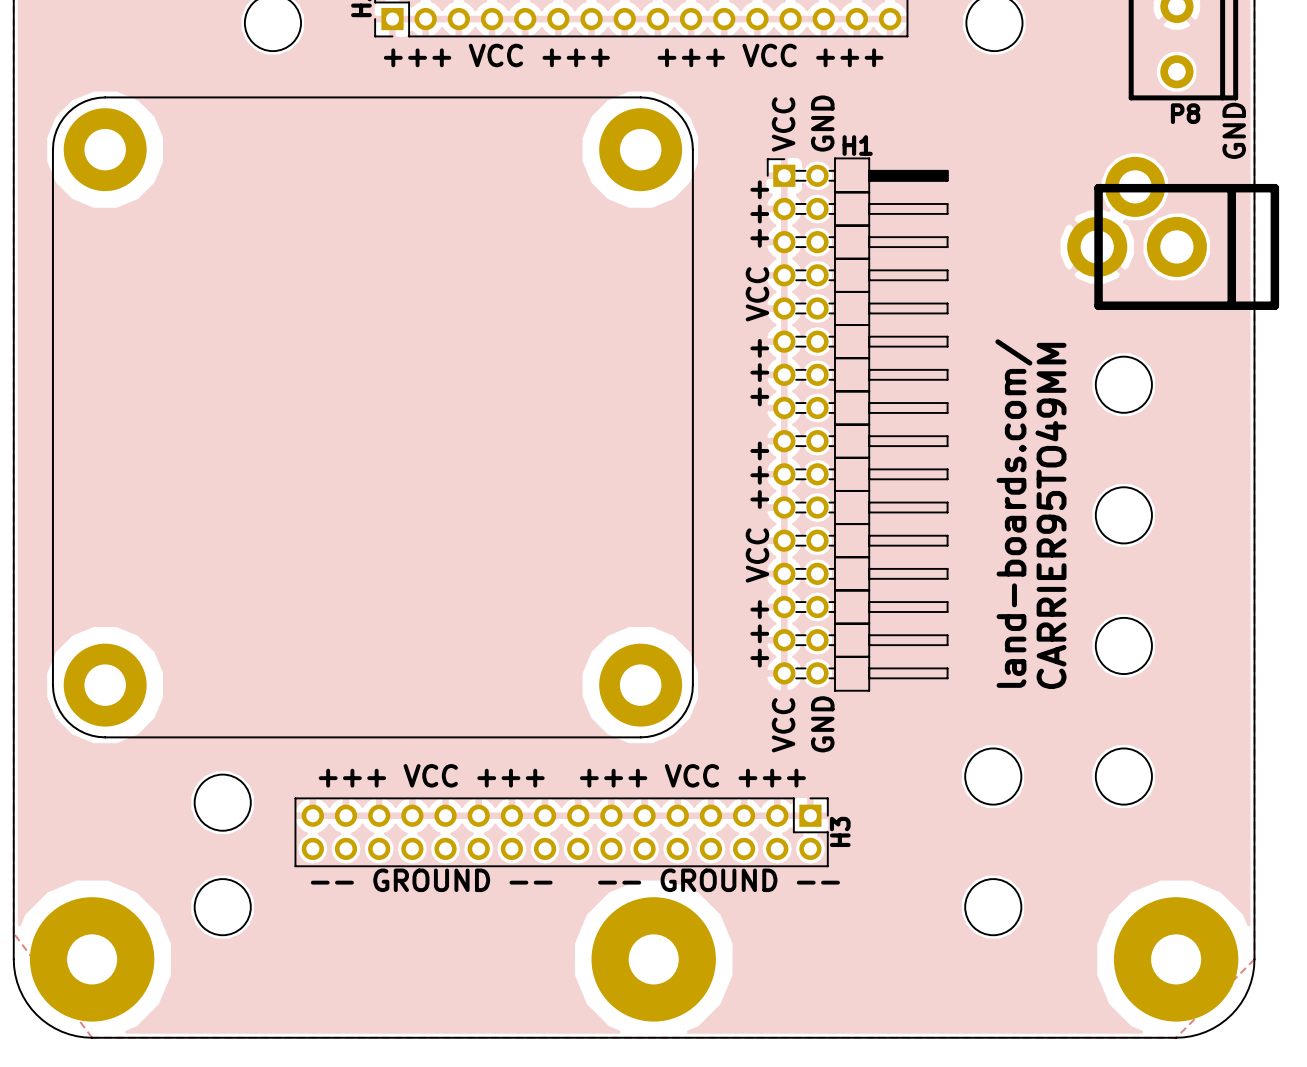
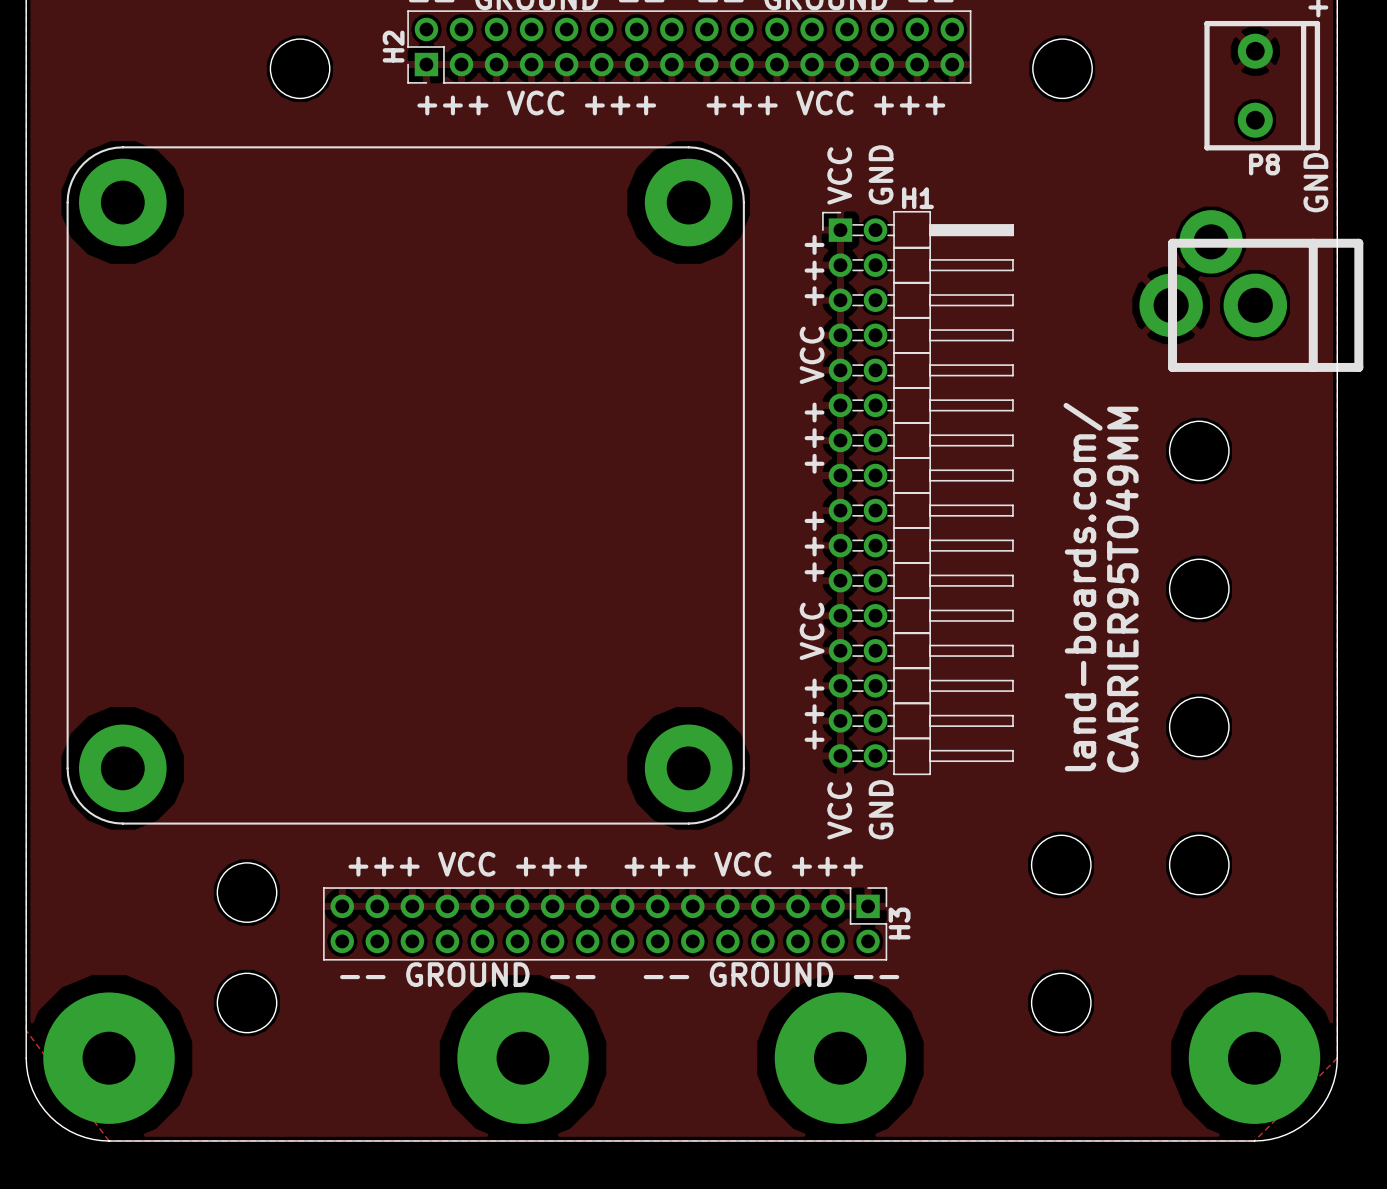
part: none -> (523, 1058)
part: (653, 959) -> none
part: none -> (840, 1058)

